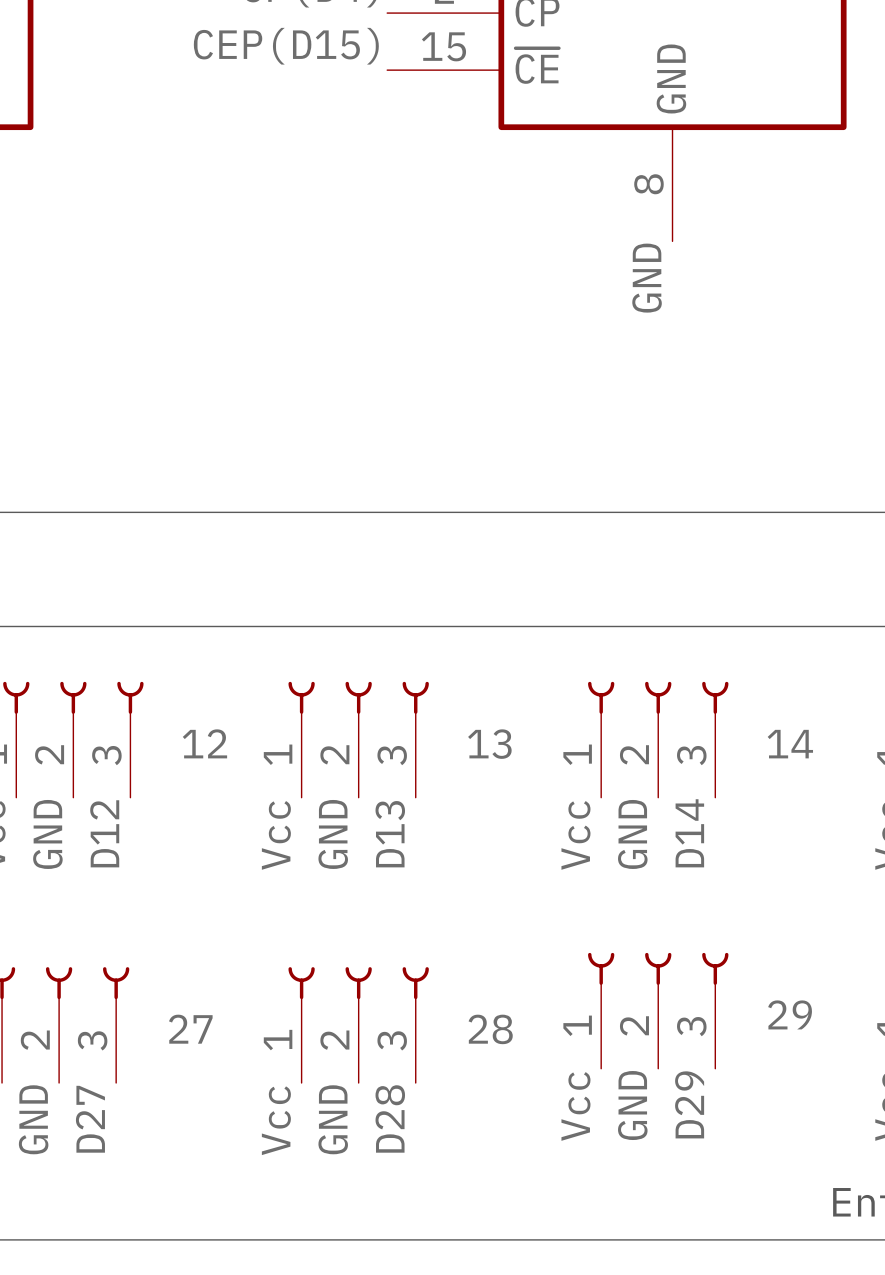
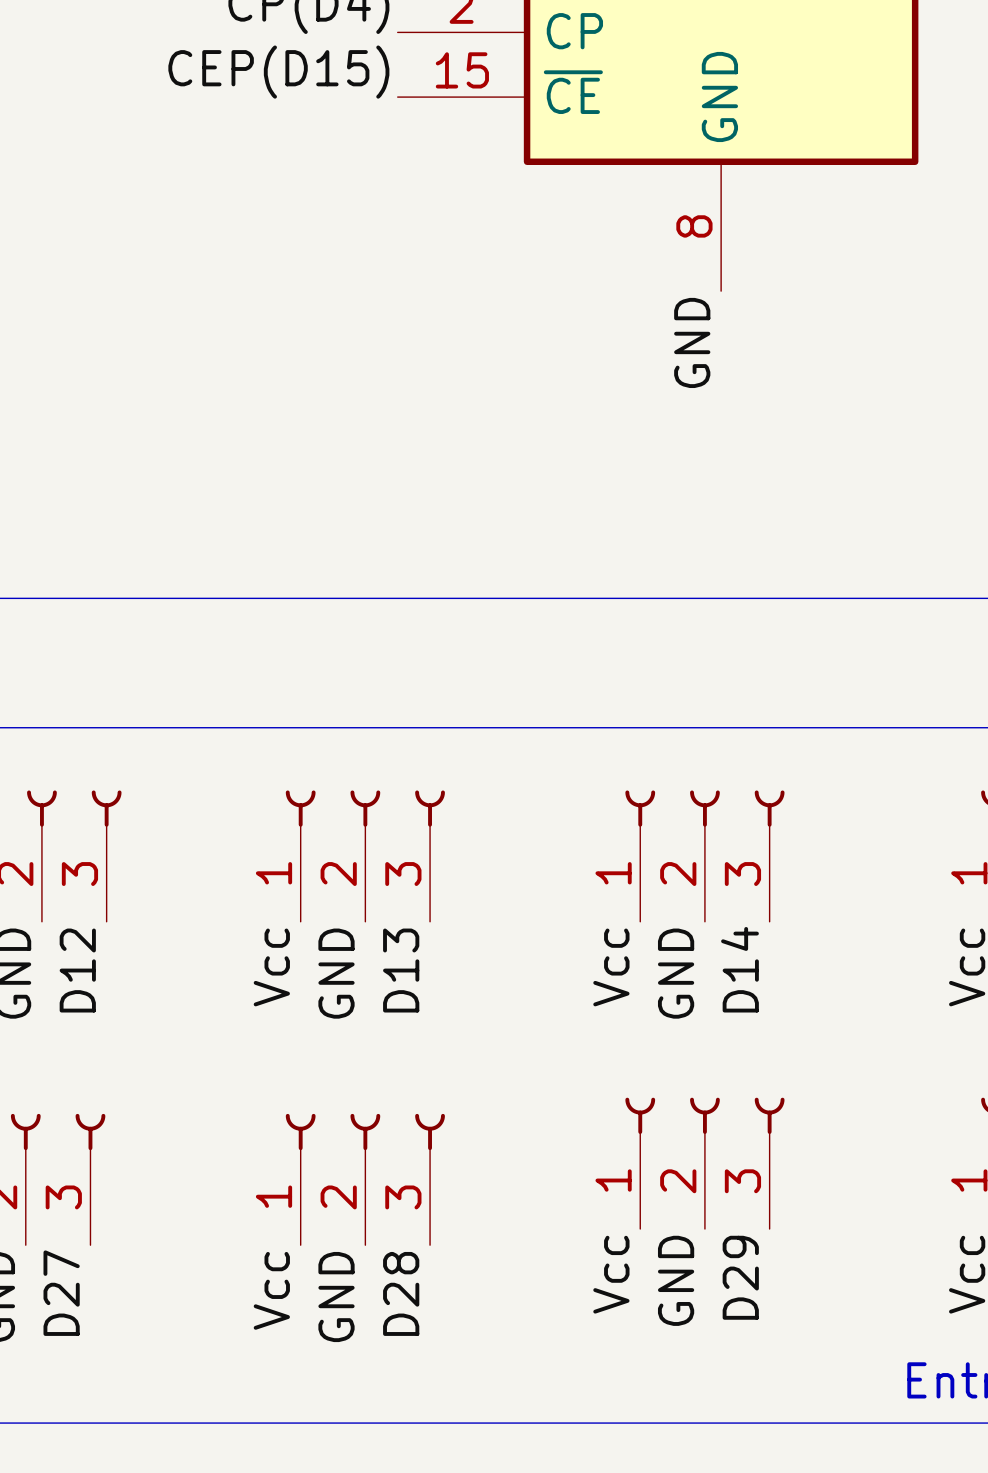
part value: 12 (204, 743) -> none
part value: 13 (489, 744) -> none
part value: 14 (790, 744) -> none
part value: 29 (790, 1014) -> none
part value: 27 (190, 1029) -> none
part value: 28 (490, 1029) -> none

